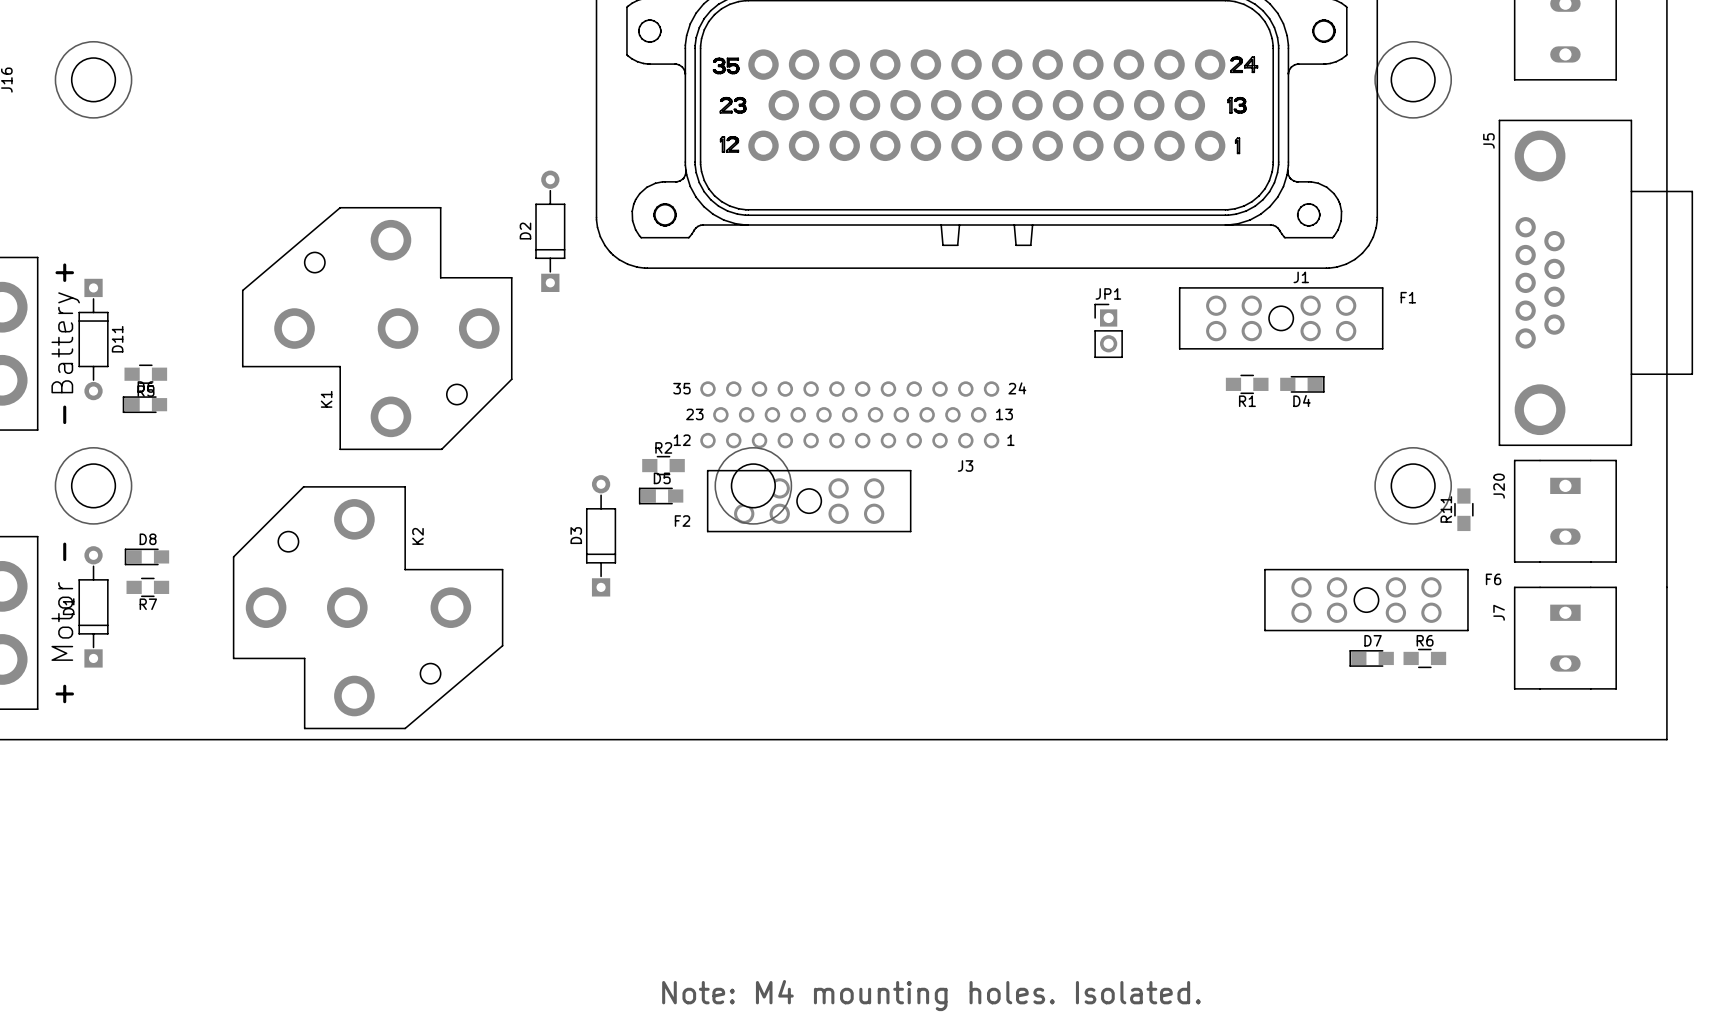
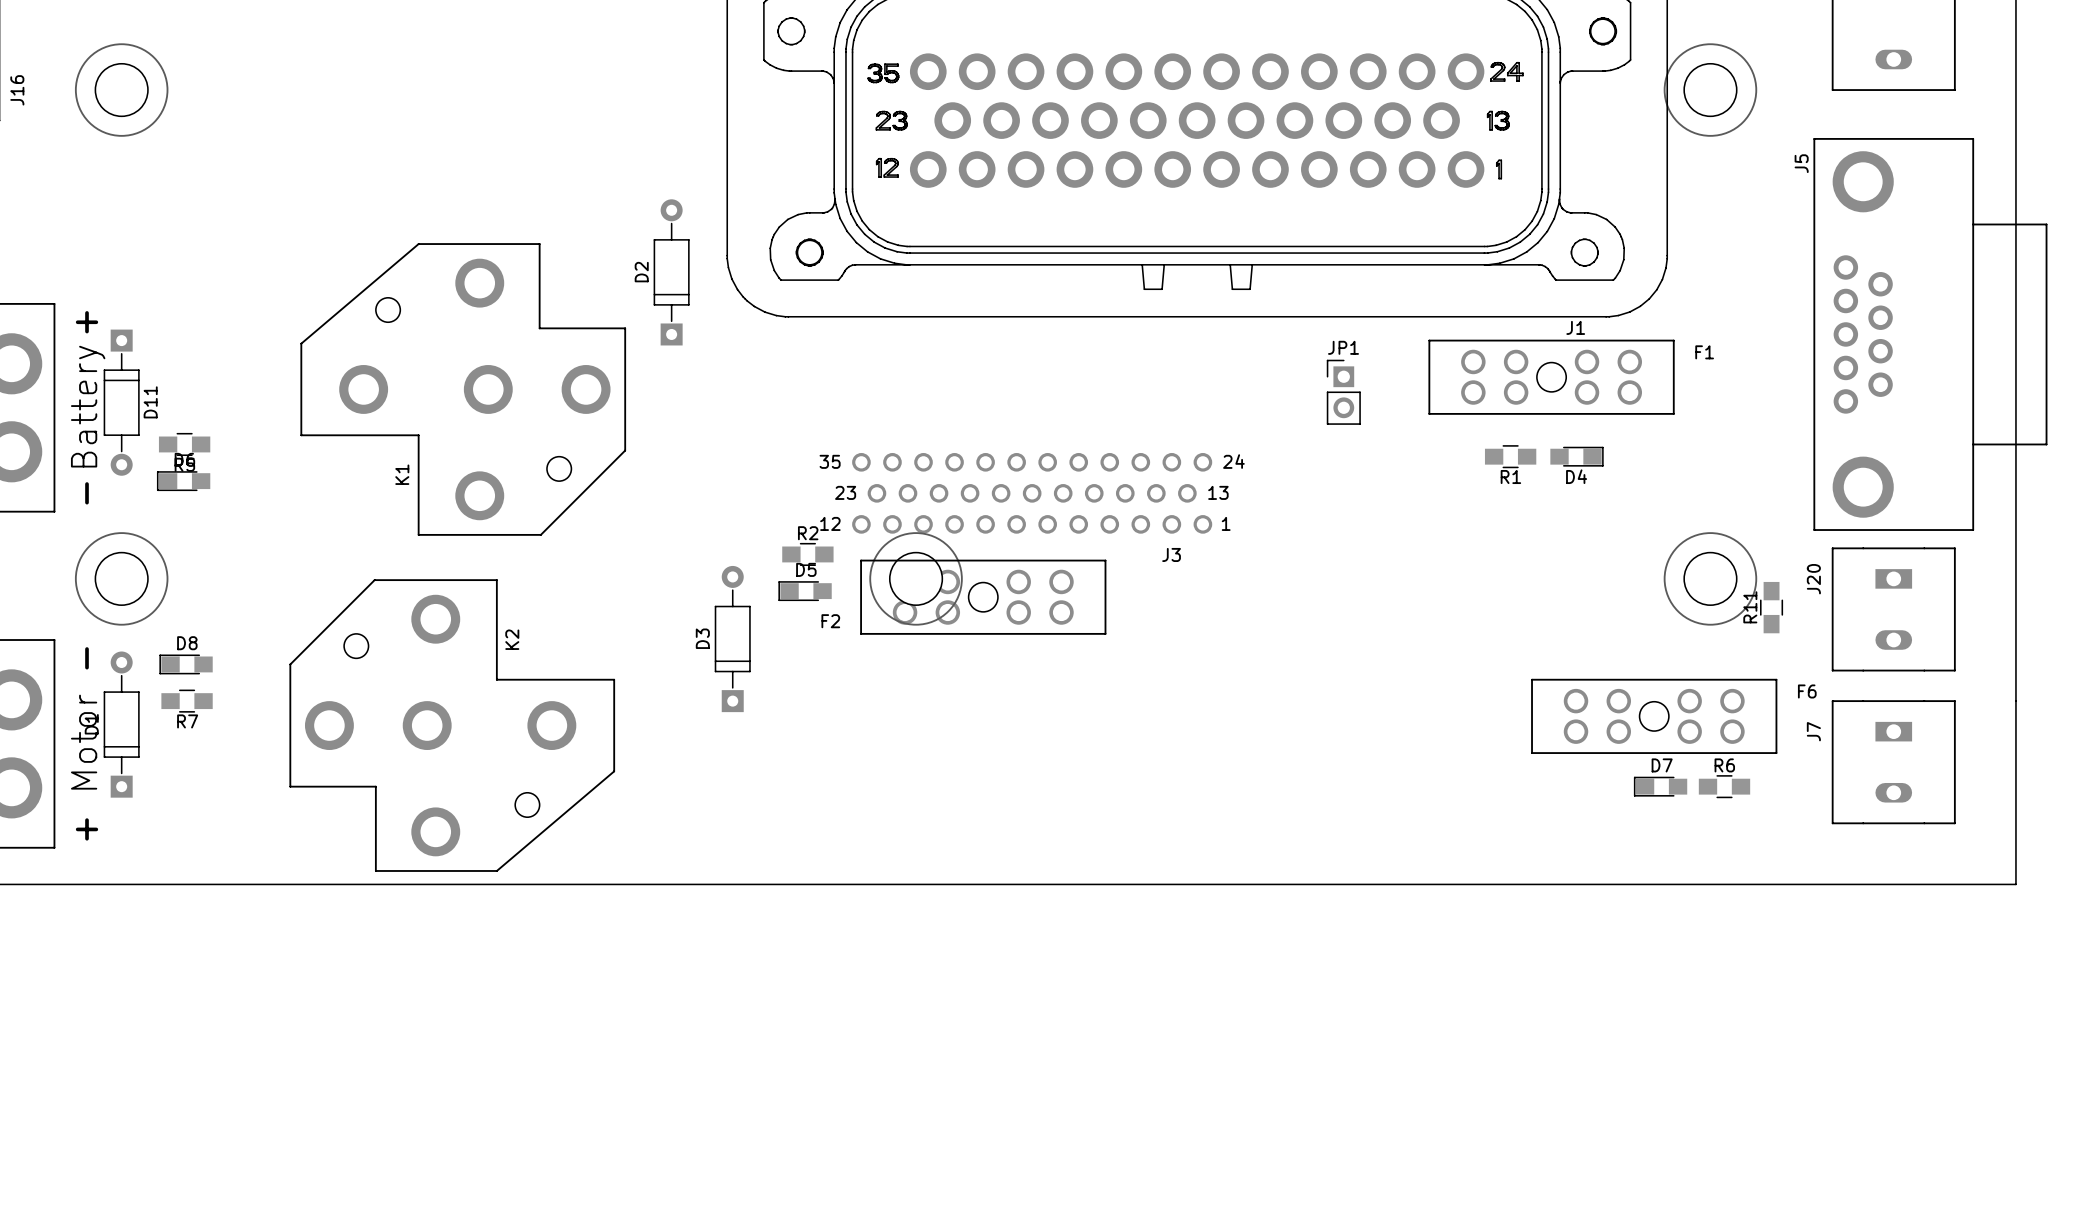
text: Note: M4 mounting holes. Isolated. (931, 995) -> none

